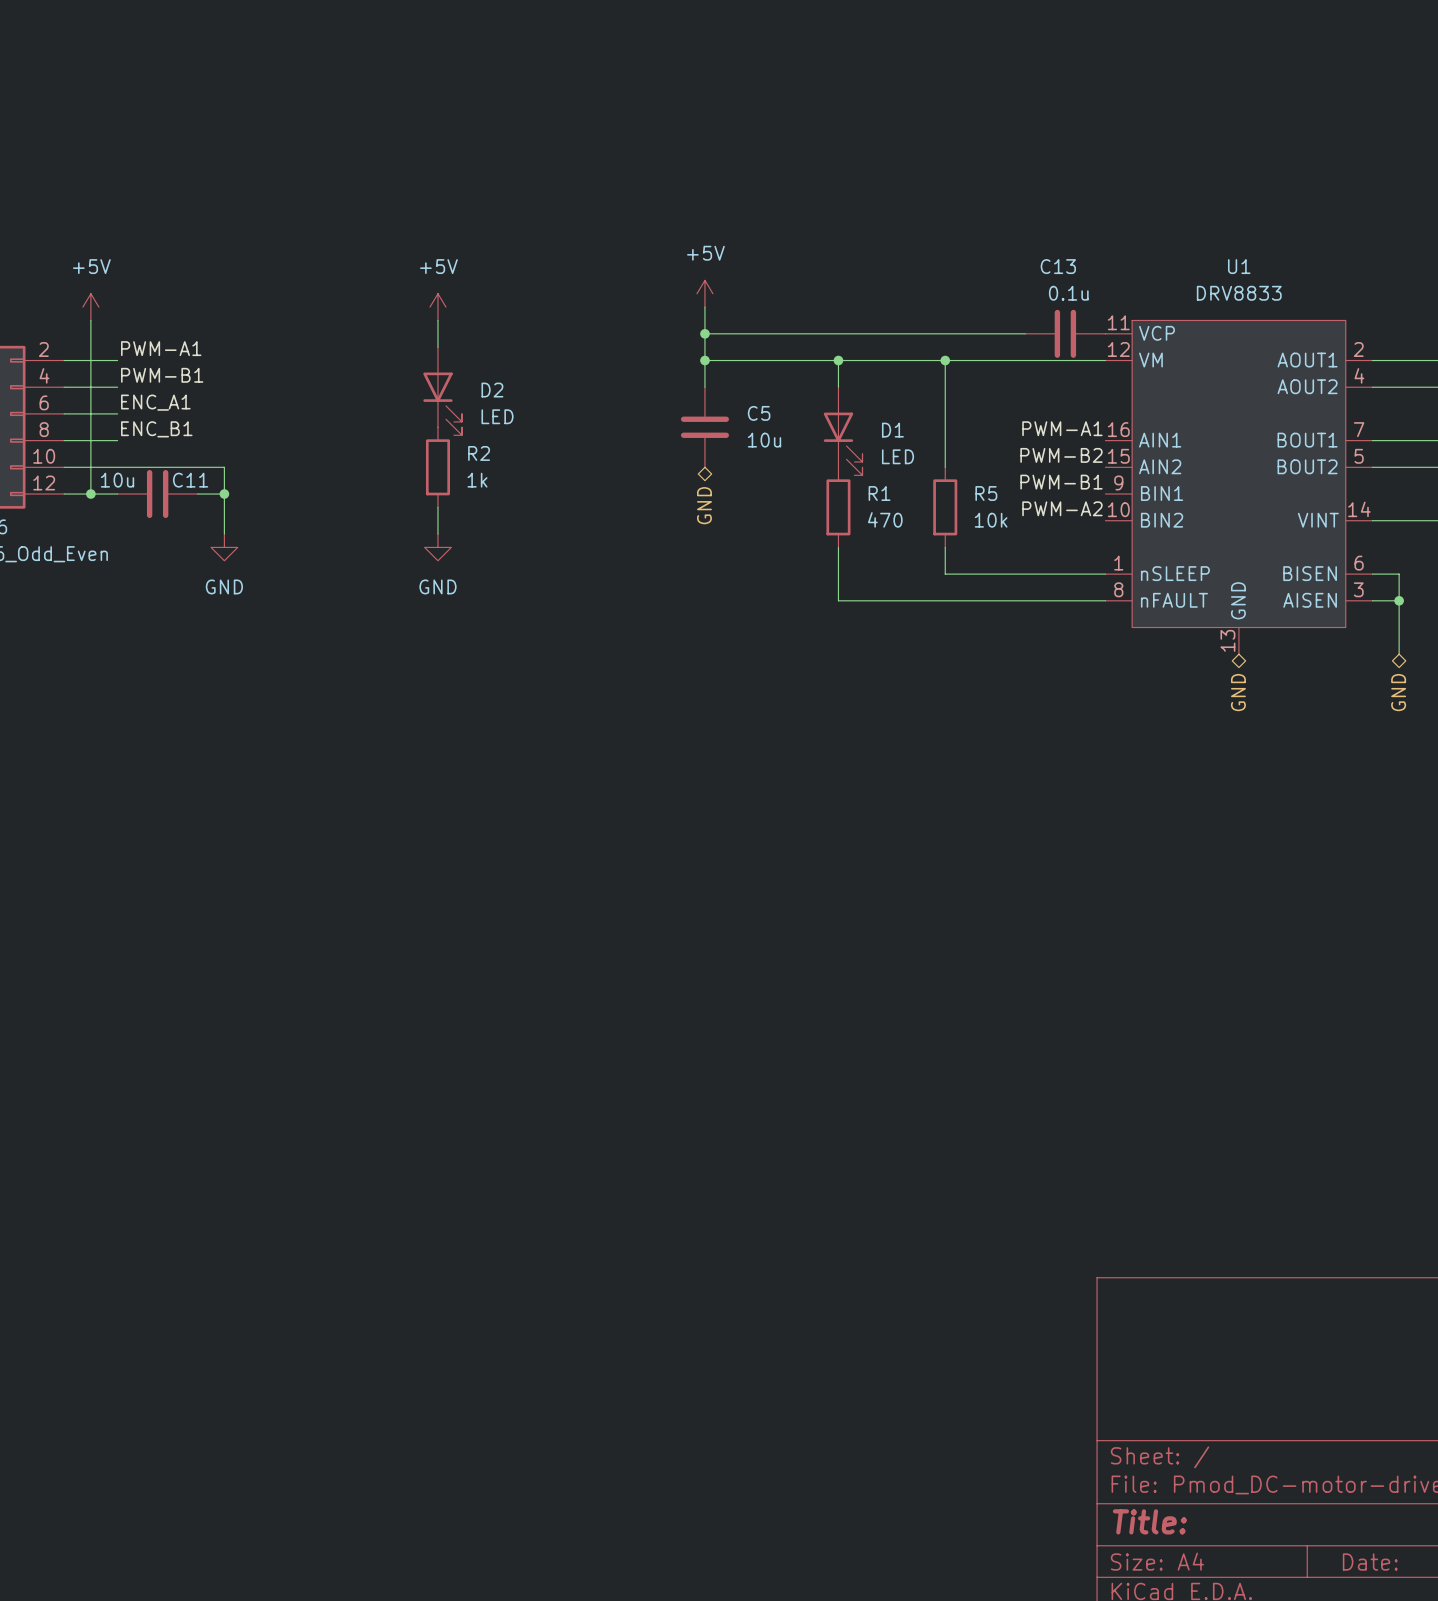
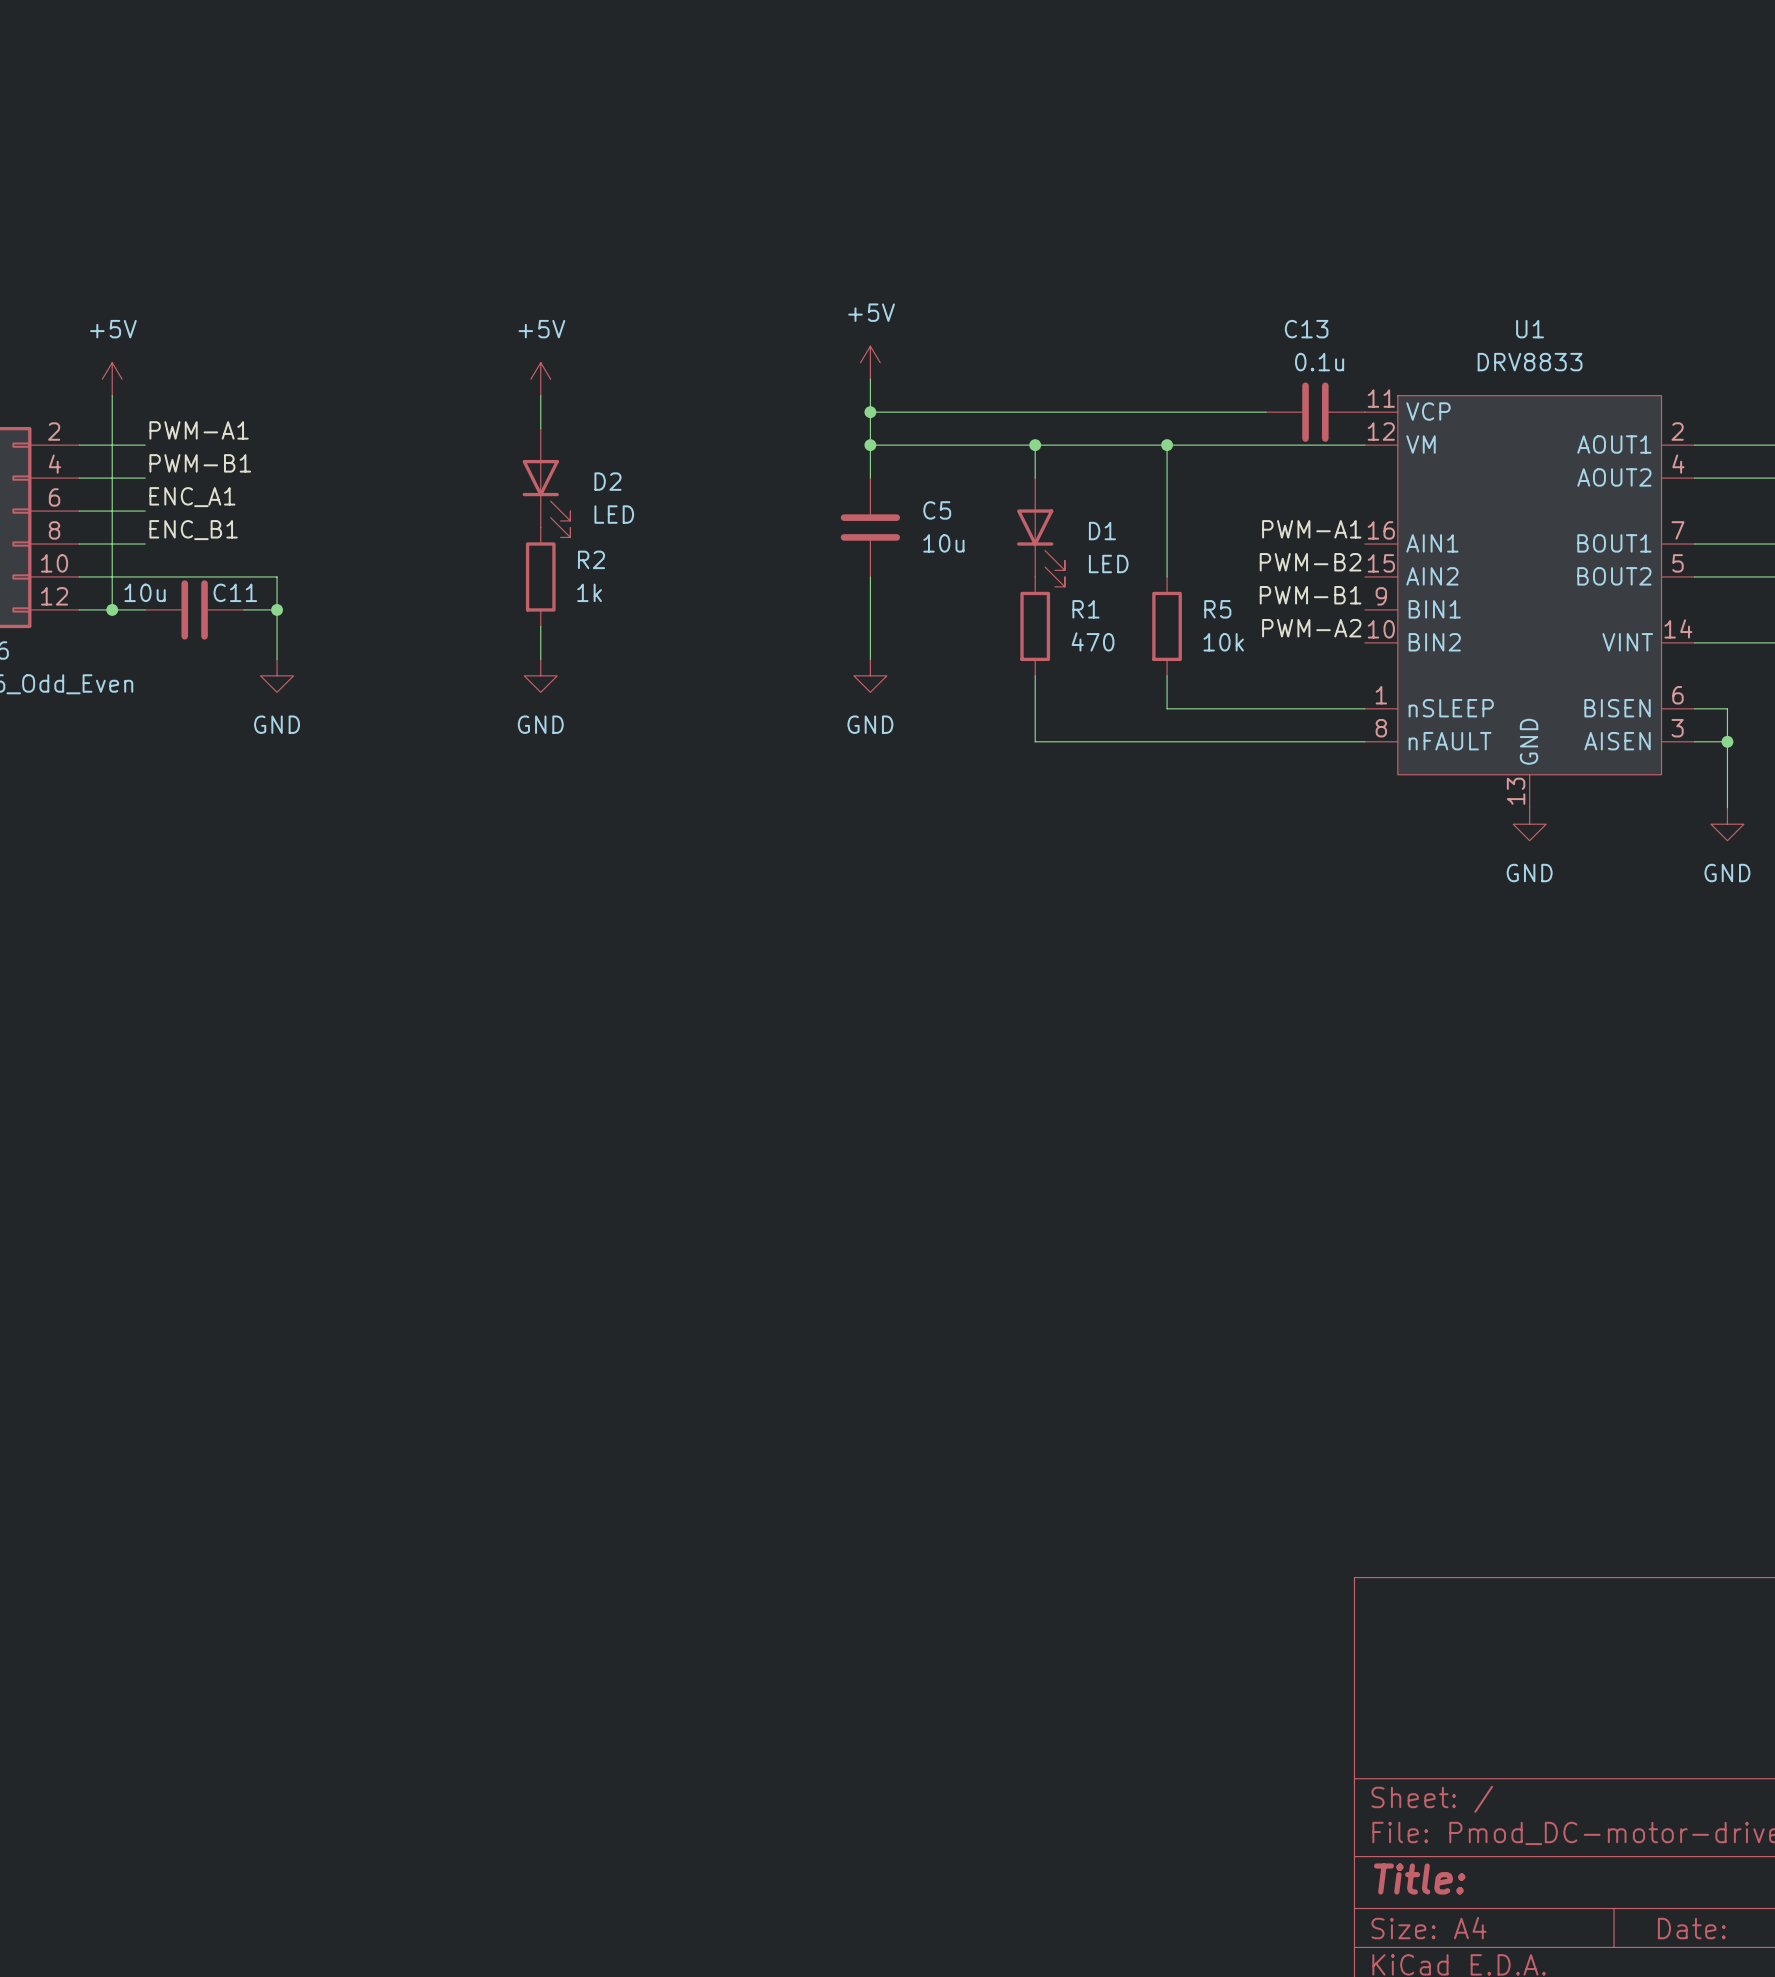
wire: none -> (870, 576) (870, 659)
hierarchical label: GND (704, 505) -> none
power symbol: none -> GND (870, 675)
power symbol: none -> GND (1529, 824)
power symbol: none -> GND (1727, 824)
hierarchical label: GND (1238, 692) -> none
hierarchical label: GND (1398, 692) -> none

